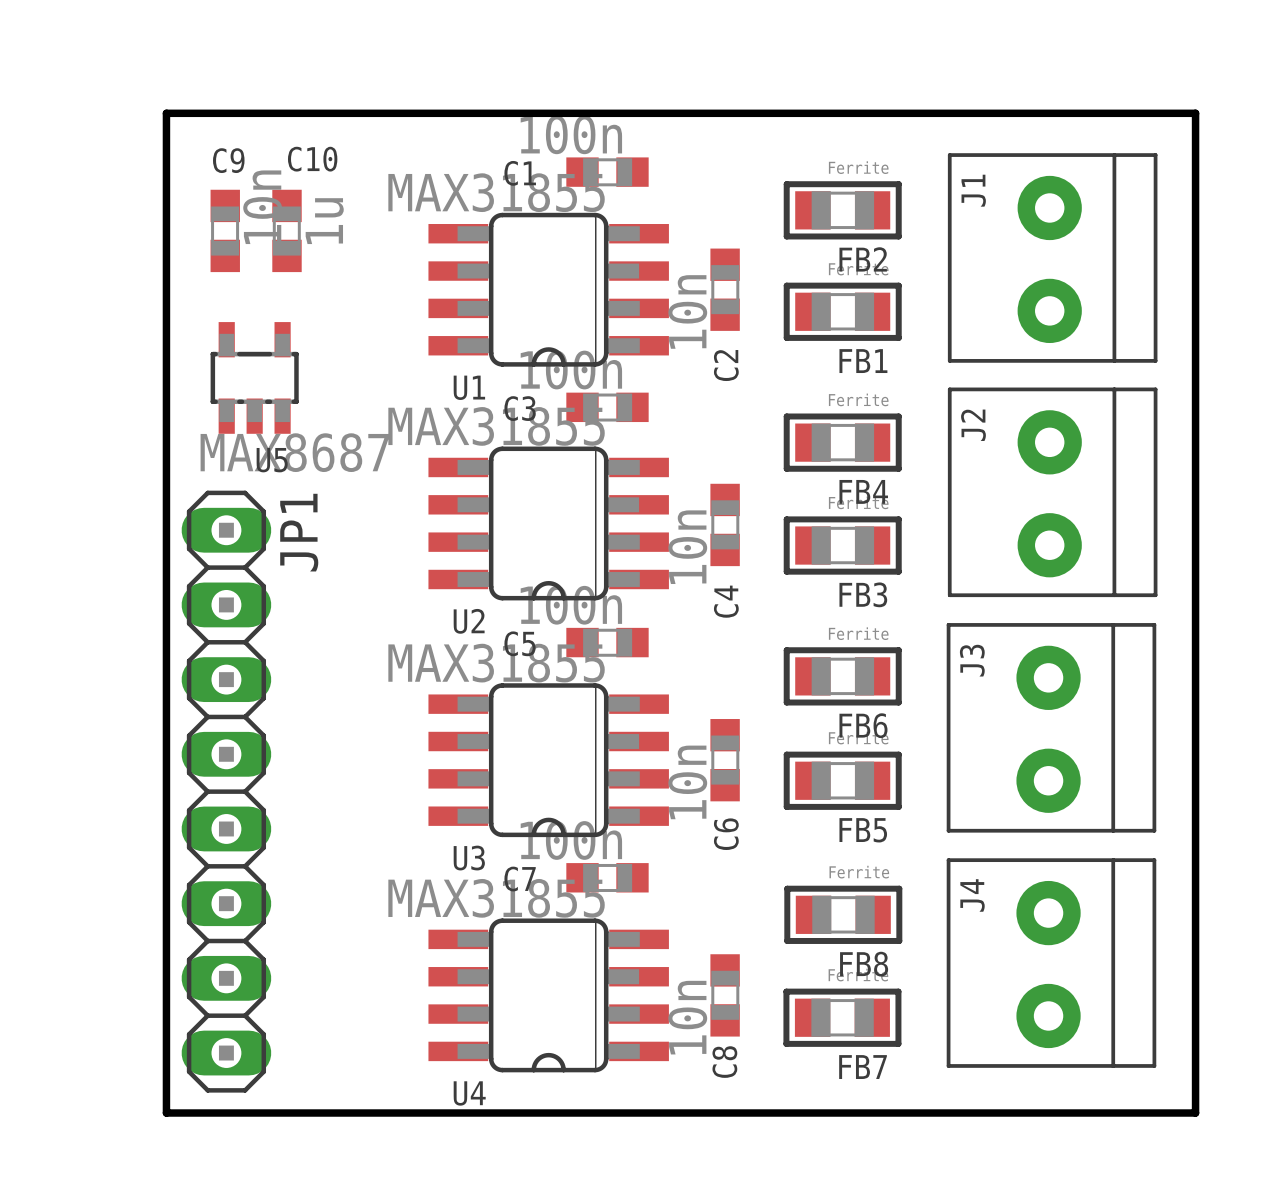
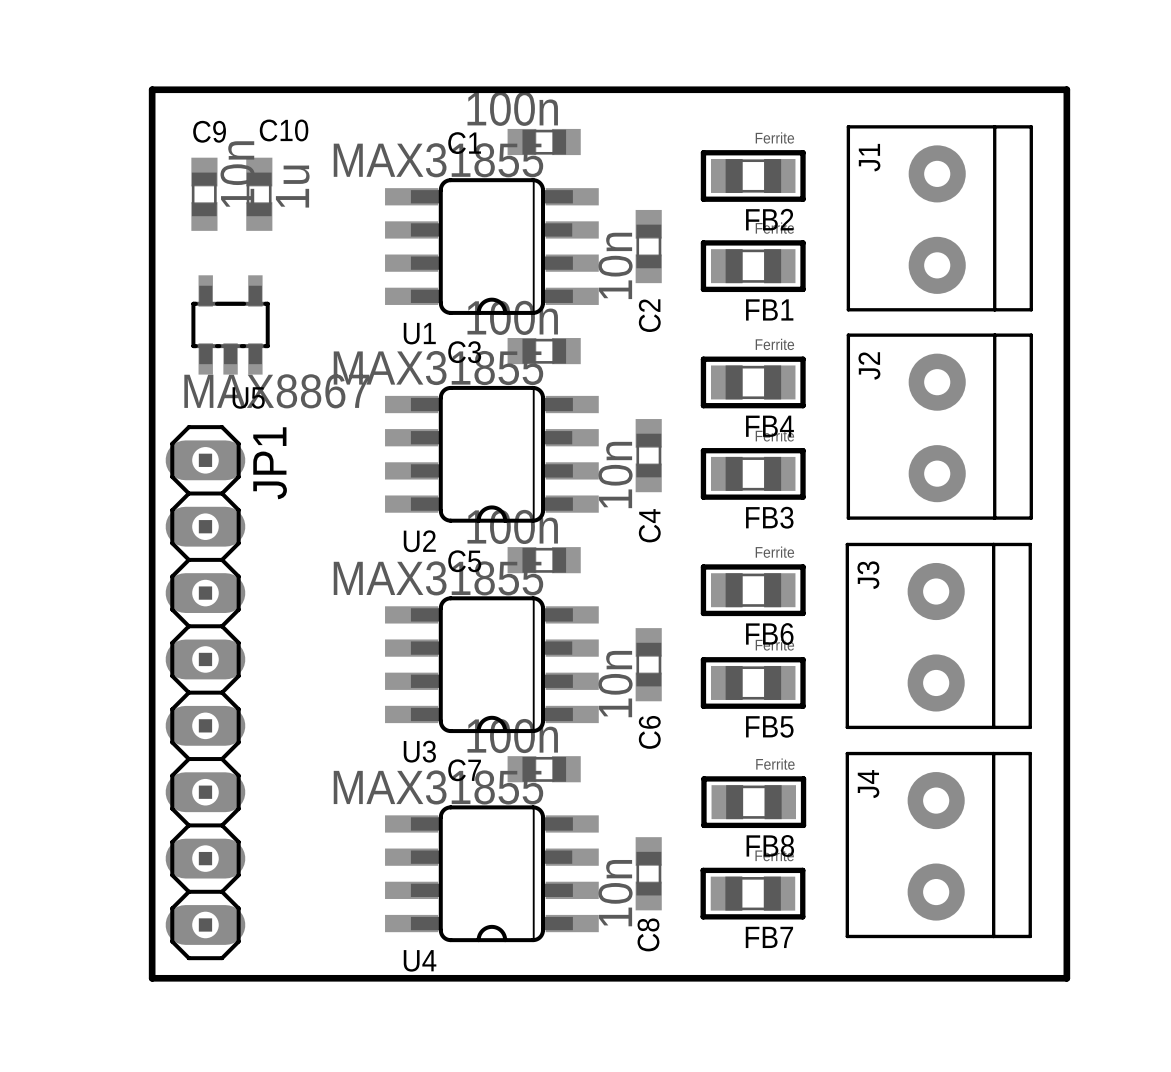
U5 value: MAX8687 (295, 452) -> MAX8867 (276, 391)

